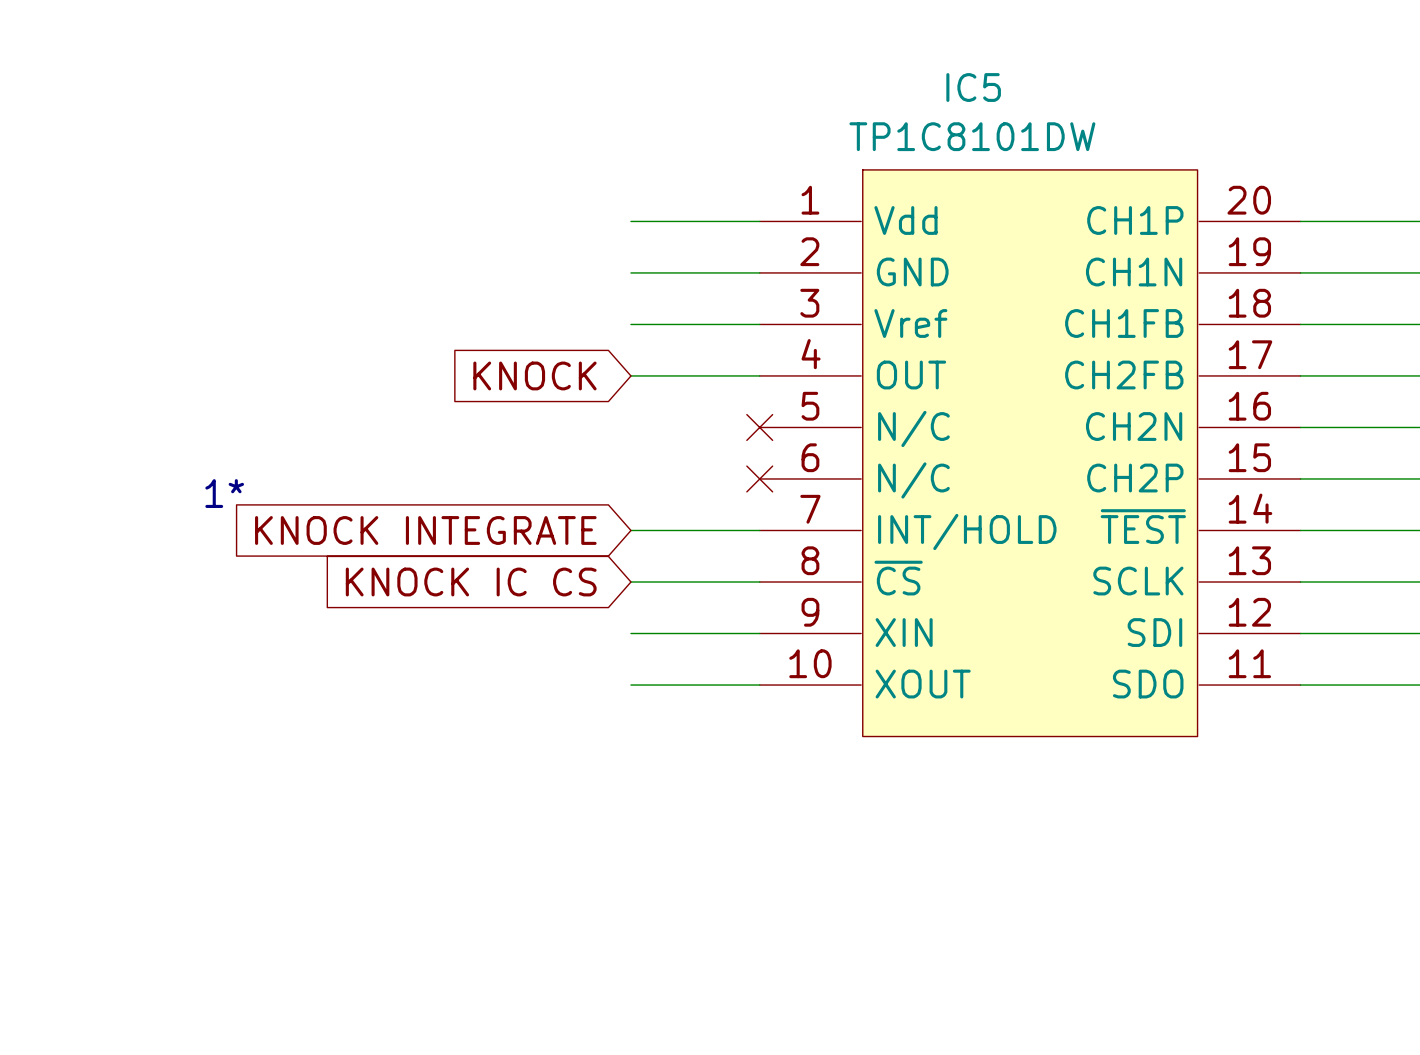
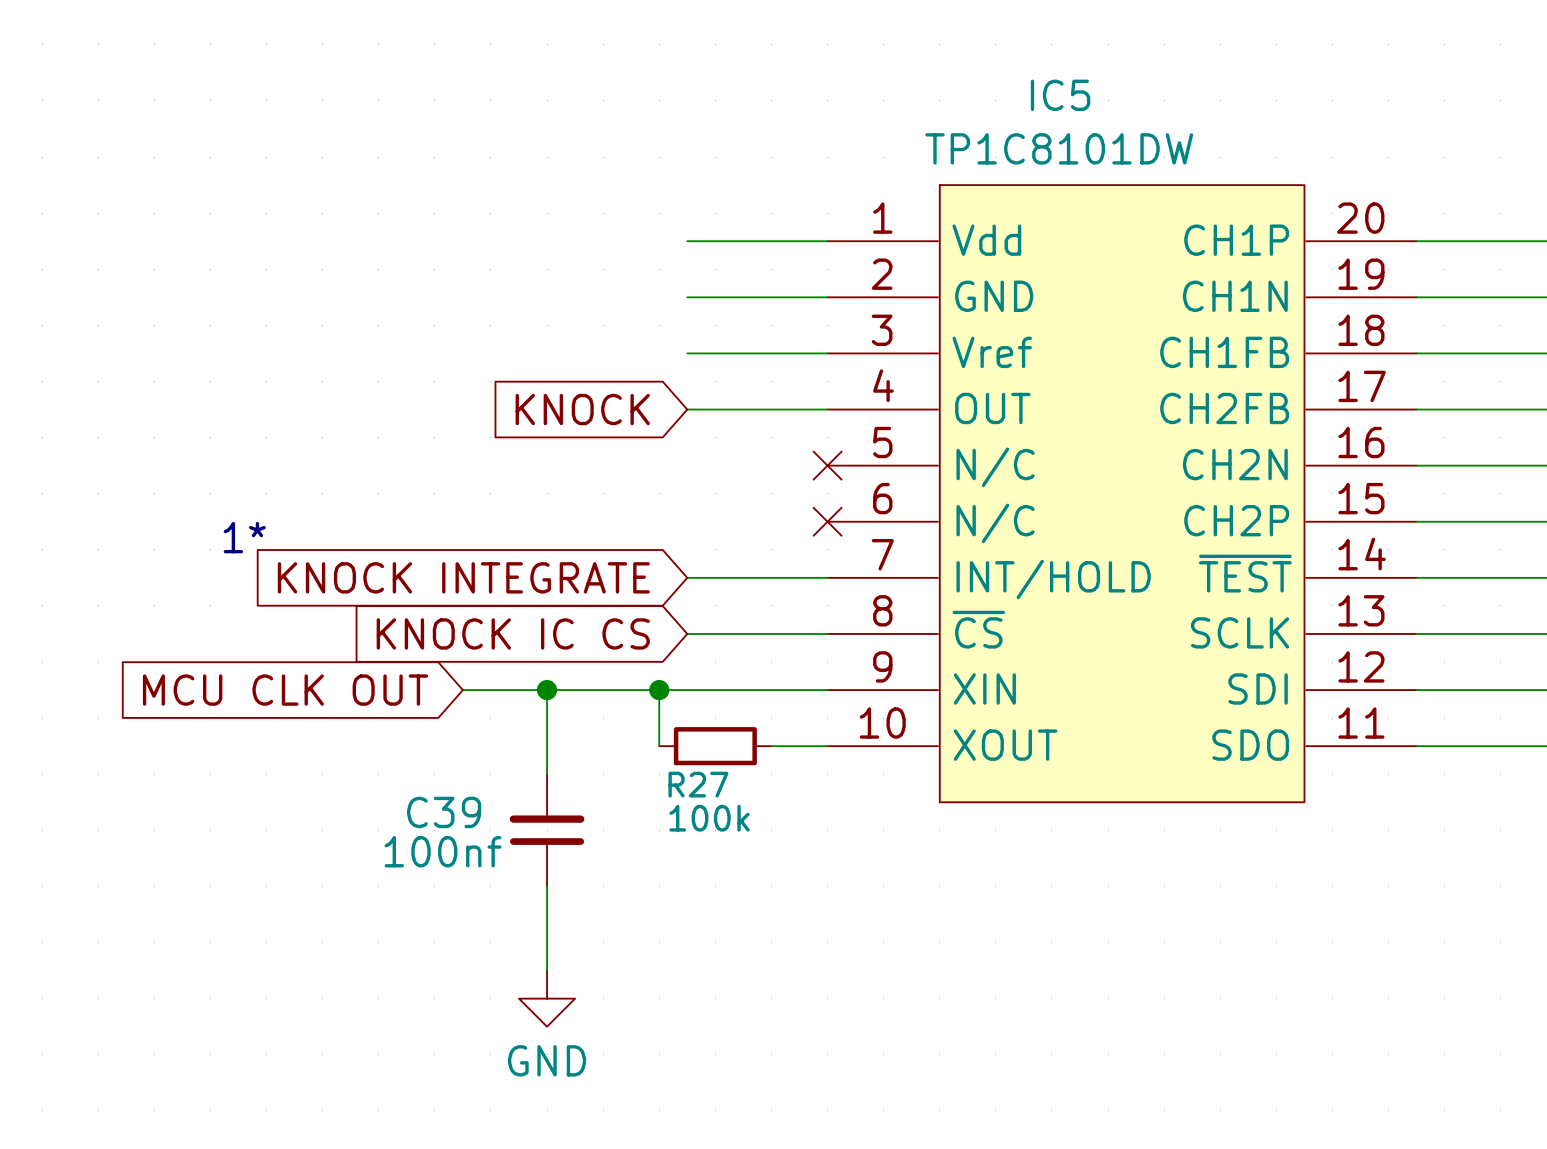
global label: none -> MCU CLK OUT (285, 690)
wire: none -> (462, 690) (687, 690)
wire: none -> (547, 690) (547, 774)
junction: none -> (547, 690)
wire: none -> (659, 690) (659, 746)
junction: none -> (659, 690)
wire: (630, 685) (708, 685) -> none
R27: none -> 100k (715, 746)
C39: none -> 100nf (547, 830)
wire: none -> (547, 886) (547, 970)
power symbol: none -> GND (547, 998)

